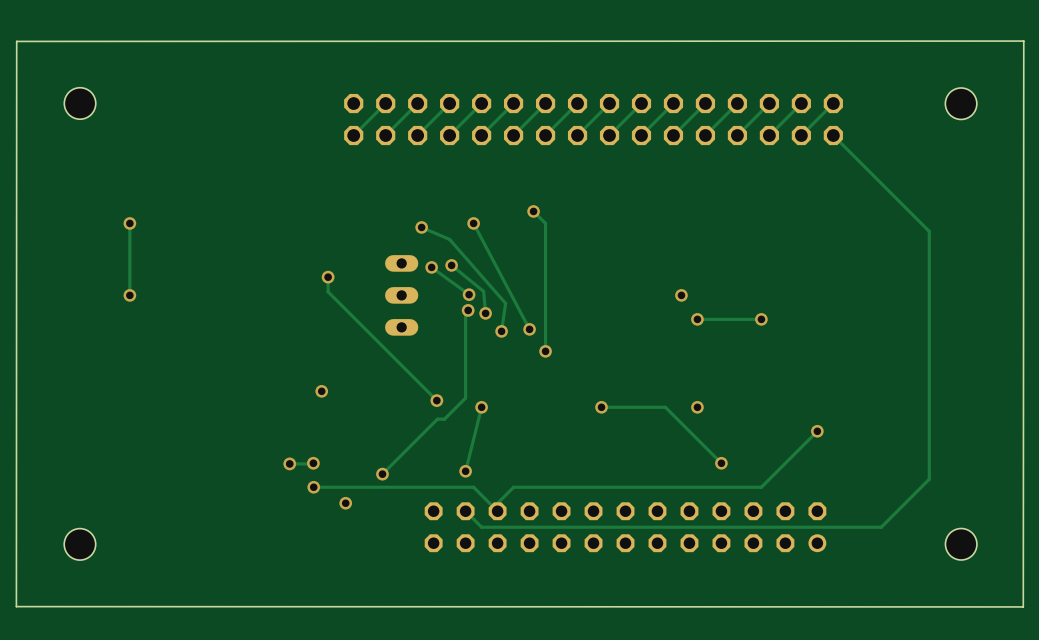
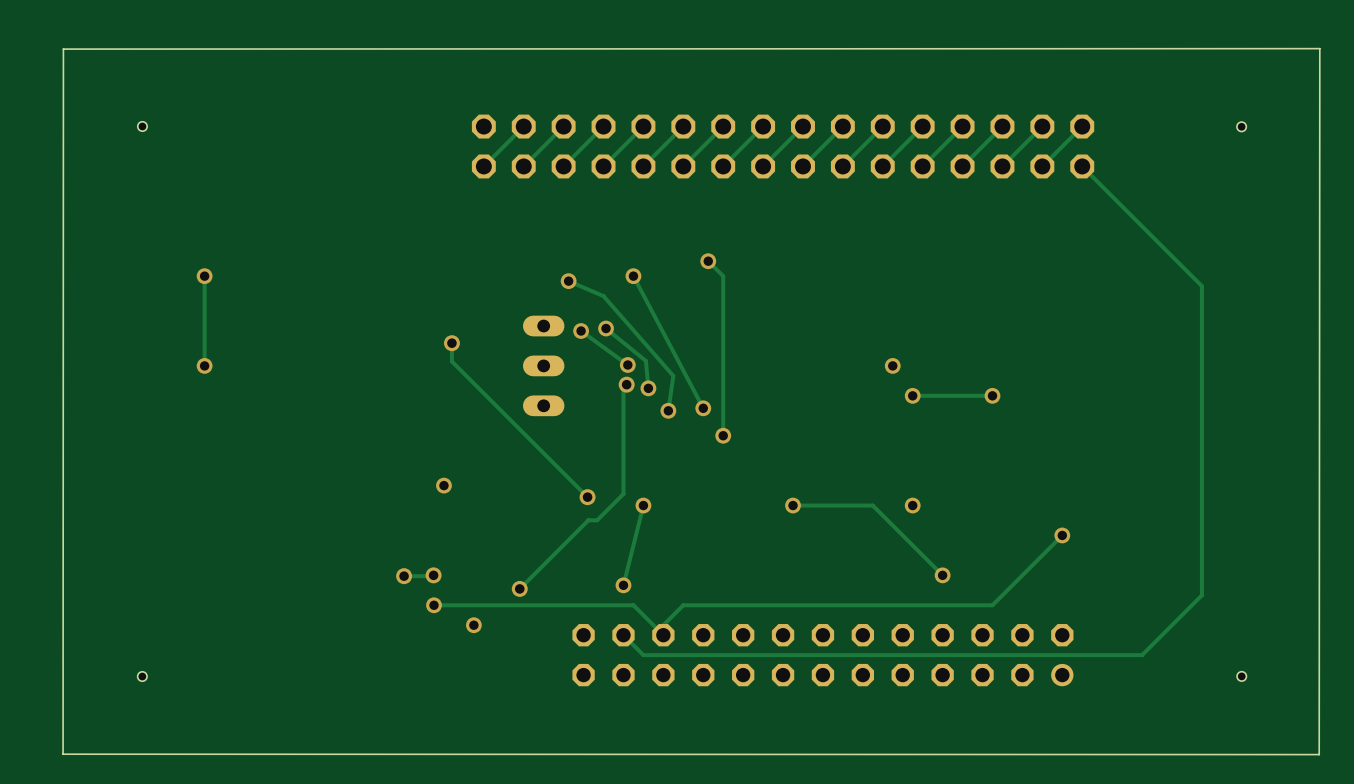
hole size: [64, 87, 96, 120] -> [137, 121, 148, 132]
hole size: [945, 87, 977, 120] -> [1236, 122, 1247, 132]
hole size: [64, 528, 96, 561] -> [137, 671, 148, 682]
hole size: [945, 528, 977, 561] -> [1237, 671, 1247, 682]

